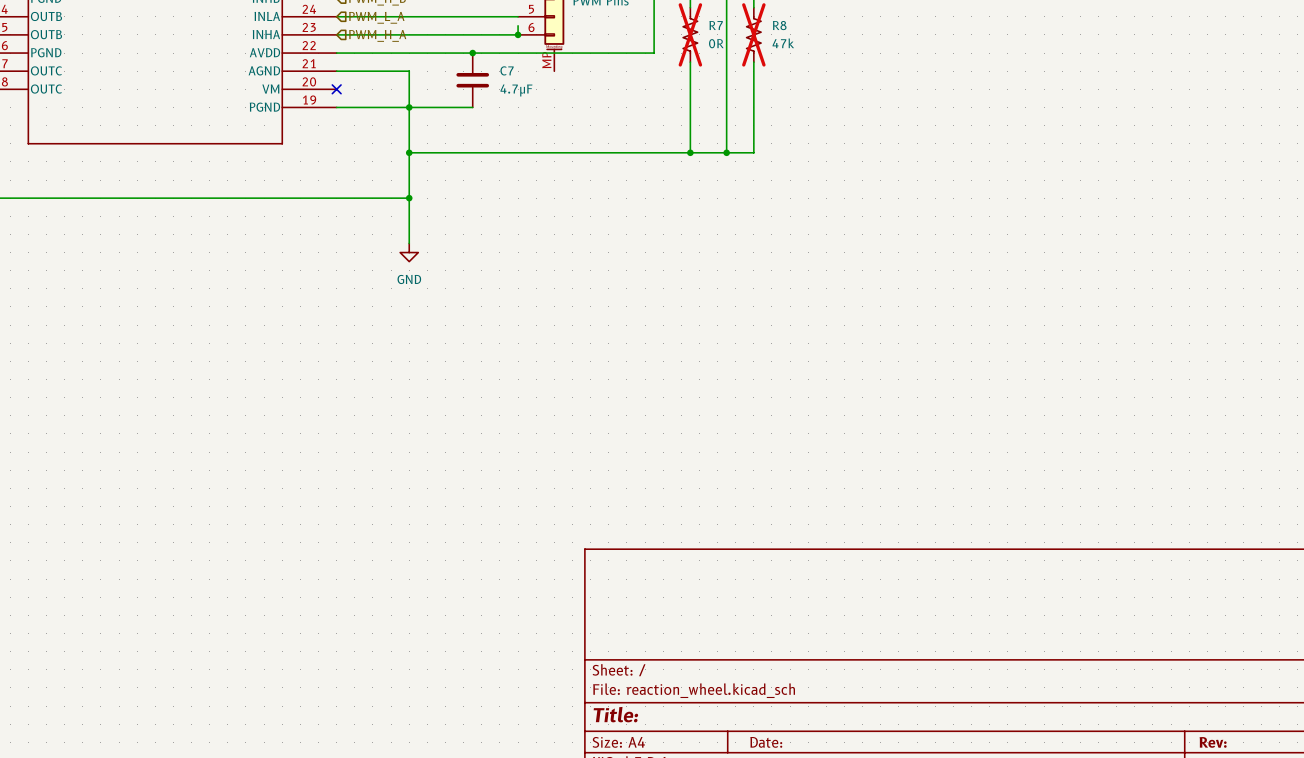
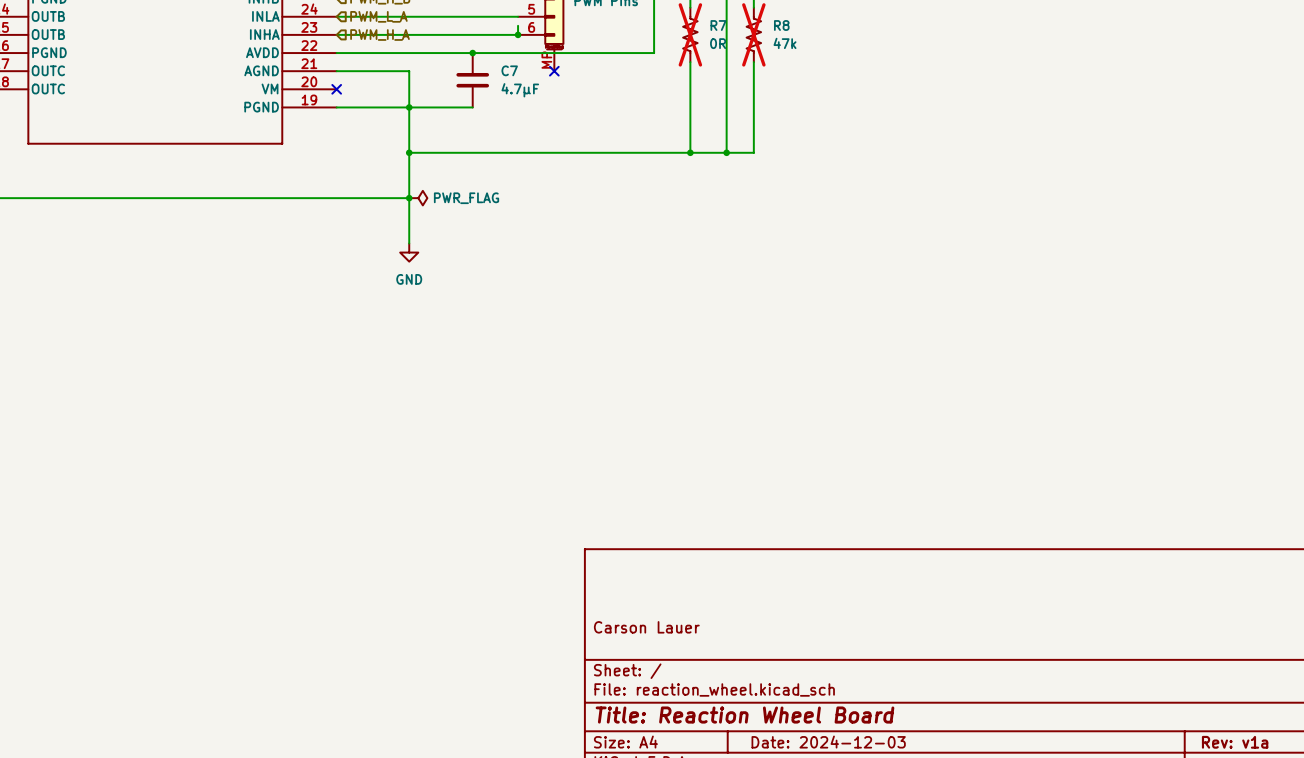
no-connect mark: none -> (554, 71)
power symbol: none -> PWR_FLAG (418, 198)
title block: none -> Carson Lauer (646, 627)
title block: Title: (615, 714) -> Title: Reaction Wheel Board (744, 715)
title block: Date: (766, 742) -> Date: 2024-12-03 (828, 742)
title block: Rev: (1213, 742) -> Rev: v1a (1235, 742)

